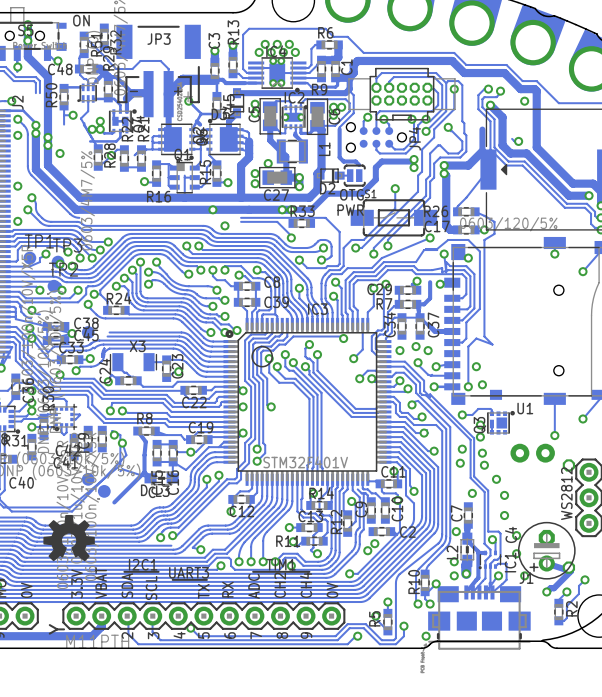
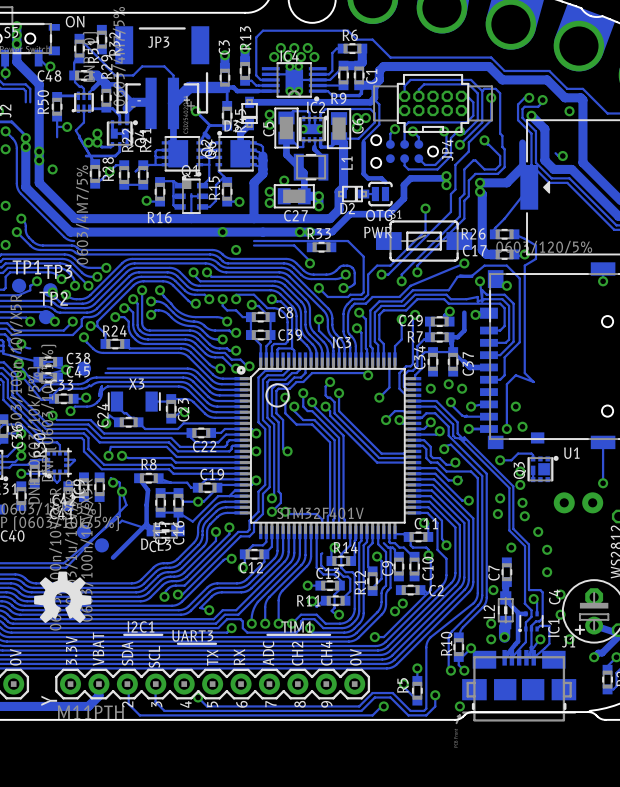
via: none -> (285, 511)
track: (302, 479) (302, 498) -> (322, 532) (322, 519) (316, 514) (287, 514) (285, 511)
via: none -> (231, 558)
track: (171, 545) (167, 545) -> (231, 558) (223, 559) (182, 601) (172, 605)

